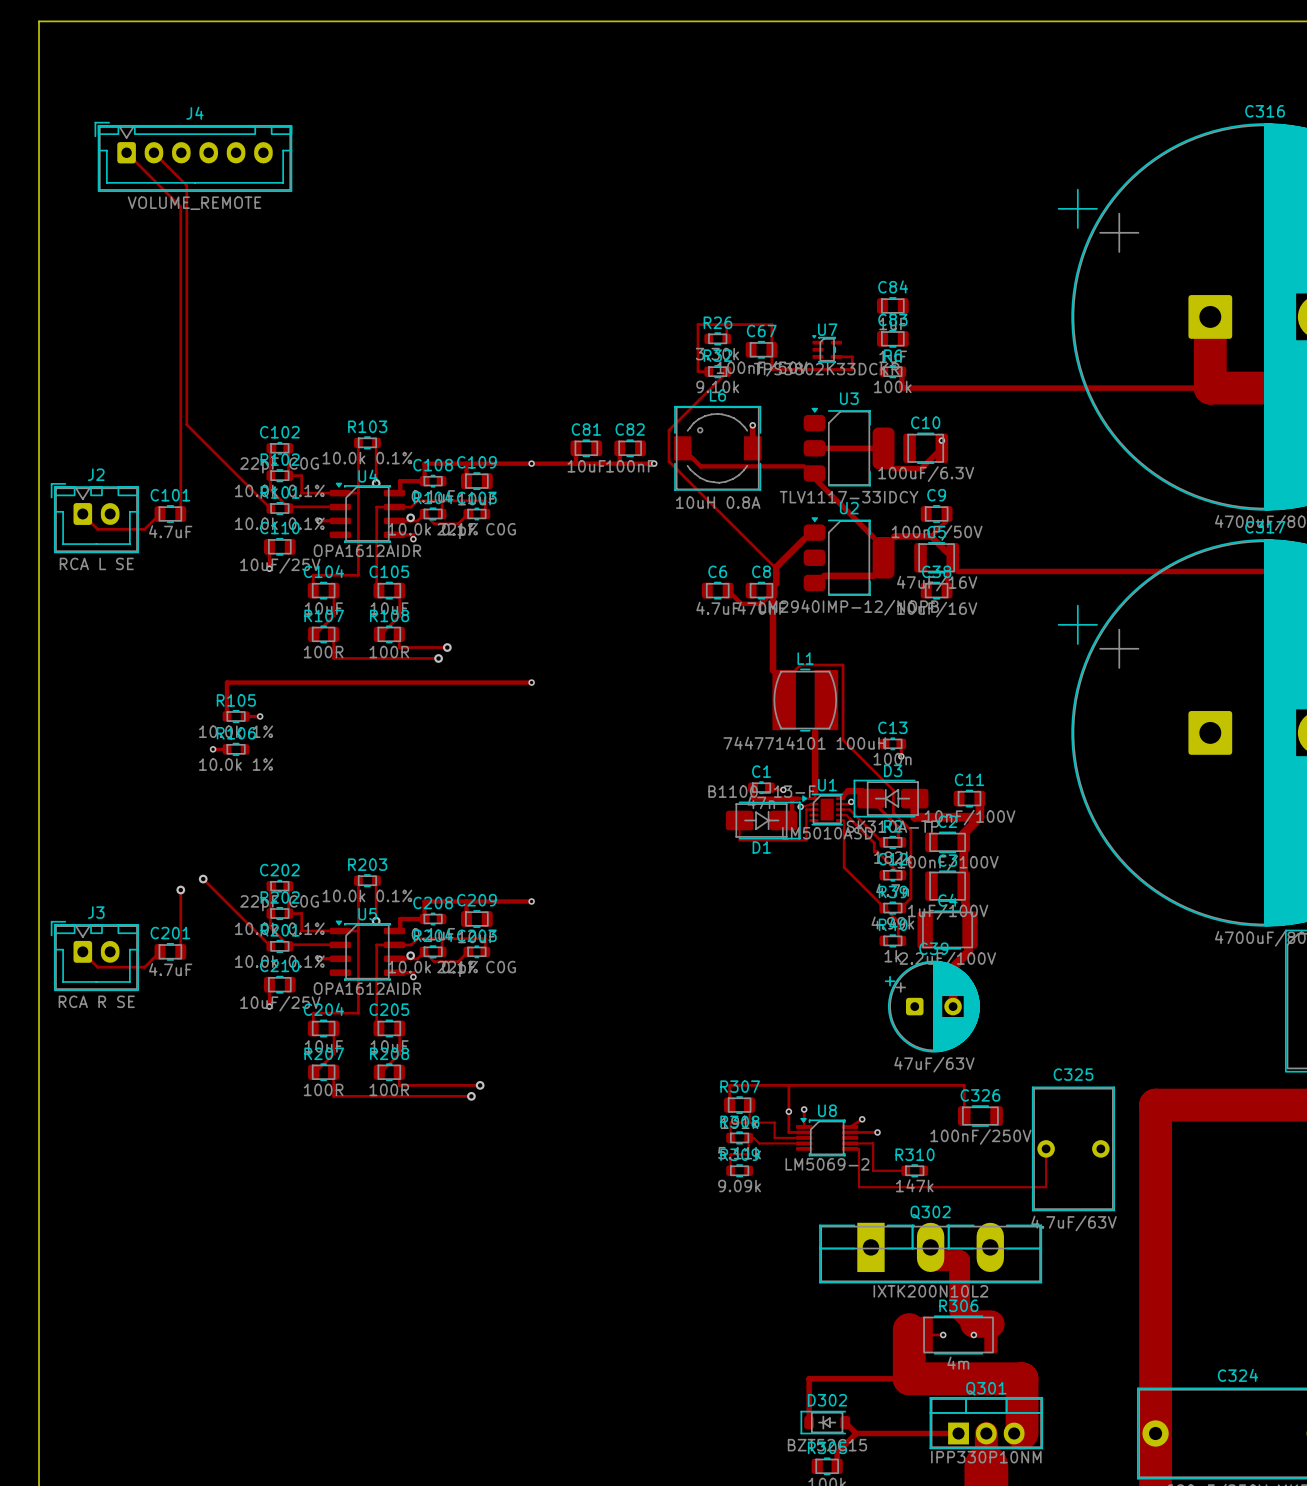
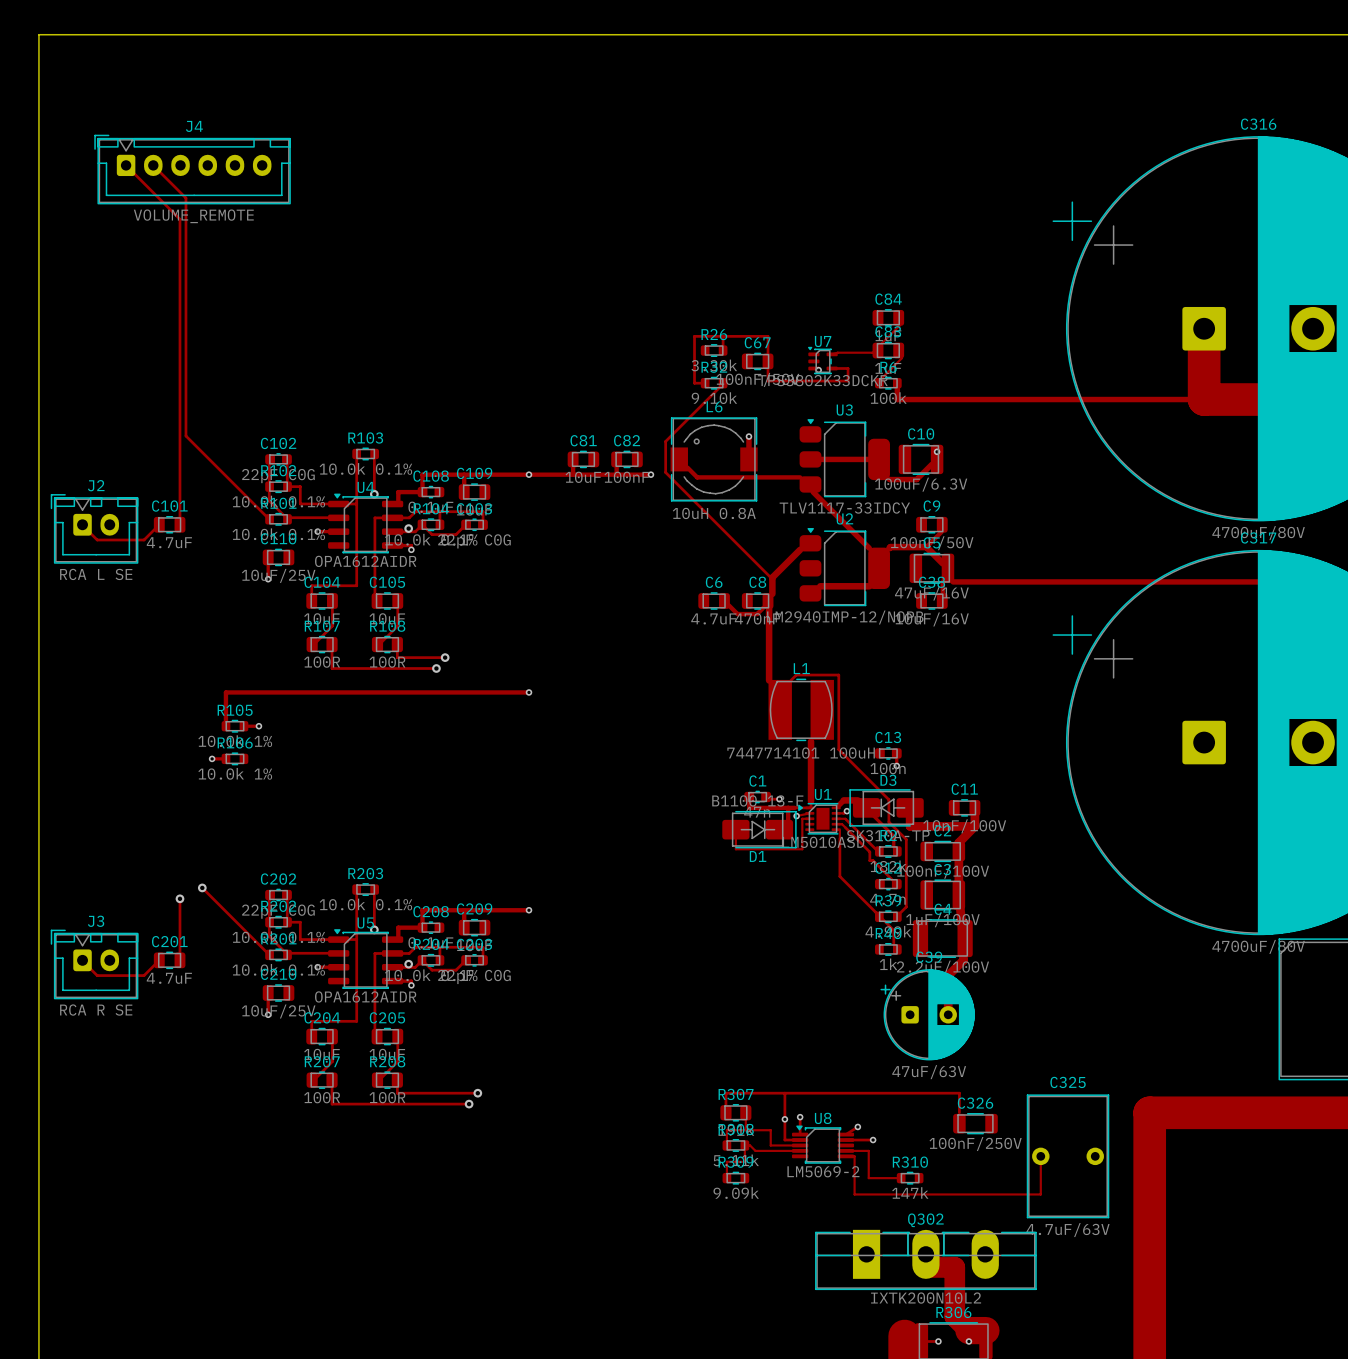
track: none -> (898, 317) (899, 325) (882, 342) (878, 350) (872, 352) (832, 354)
track: none -> (898, 350) (901, 358) (879, 383)
via: none -> (818, 370)

